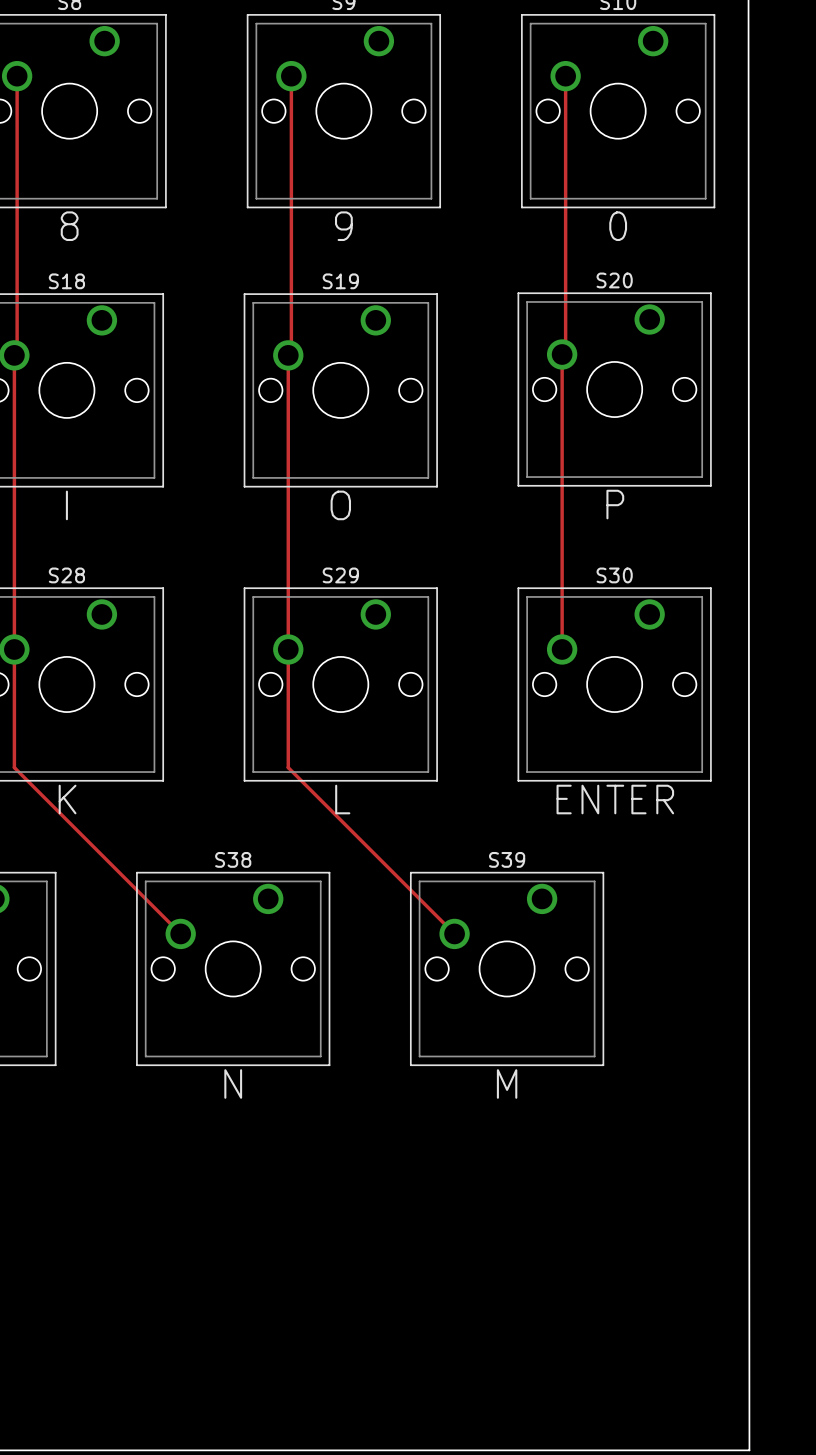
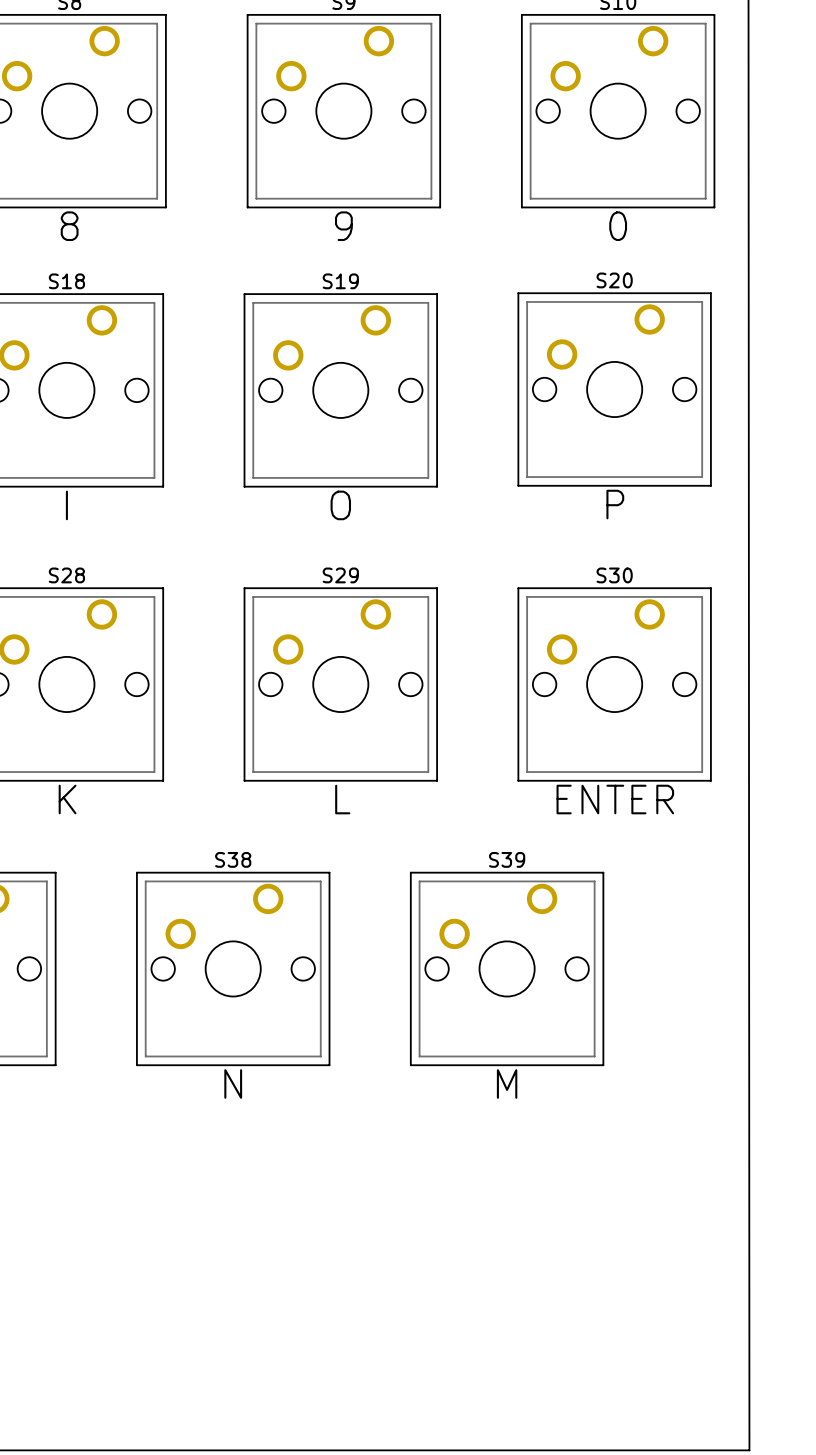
track: (17, 76) (17, 352) (14, 355) (14, 767) (180, 933) -> none
track: (291, 76) (291, 352) (288, 355) (288, 767) (454, 933) -> none
track: (565, 76) (565, 350) (562, 354) (562, 649) -> none

